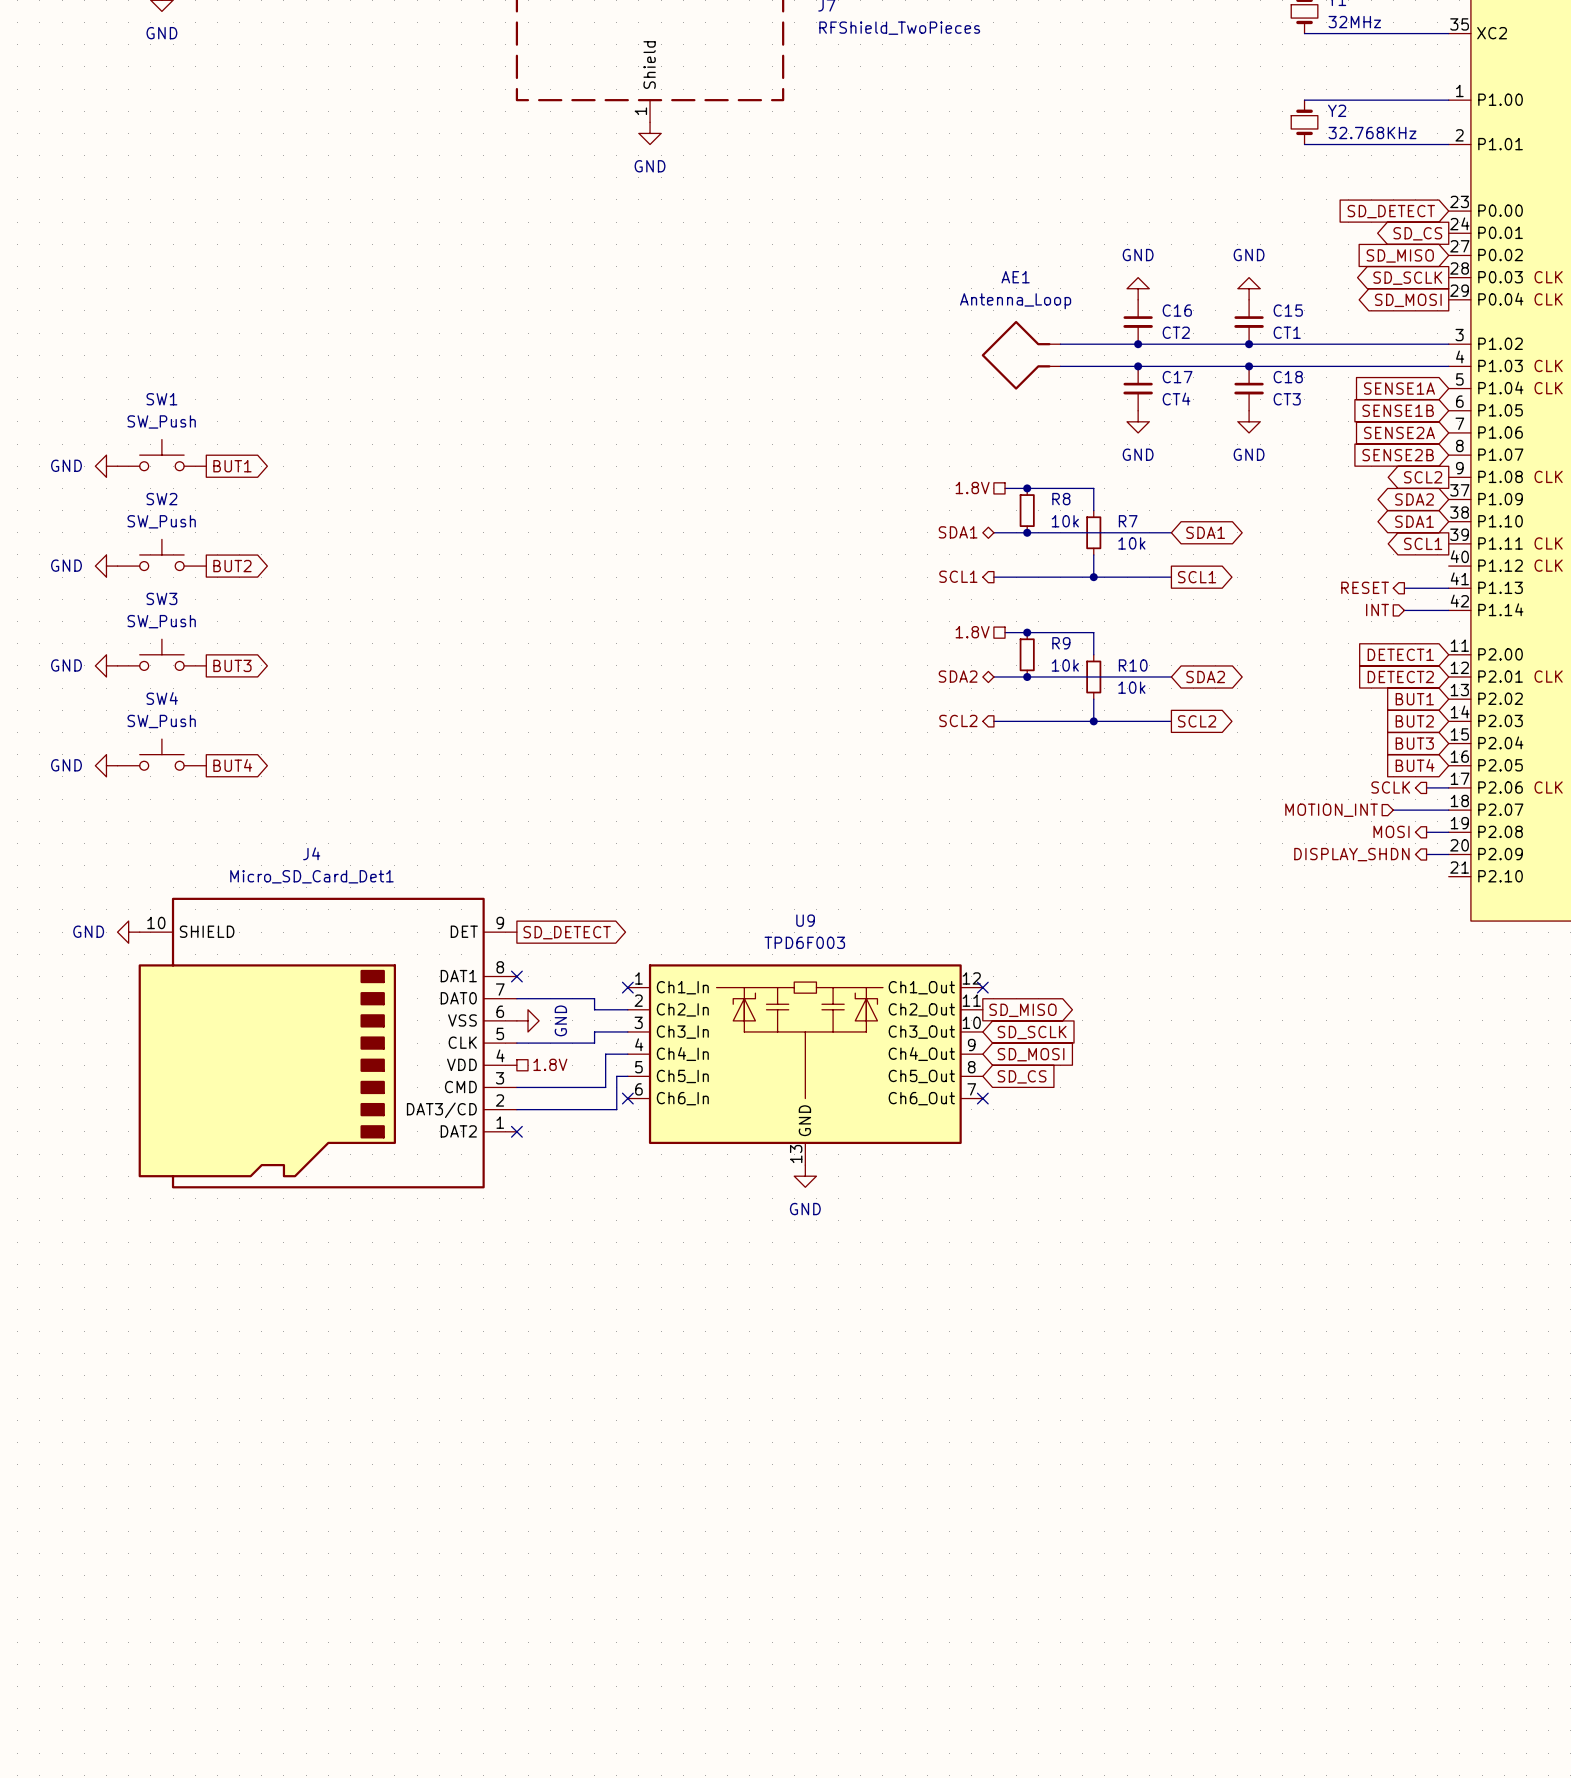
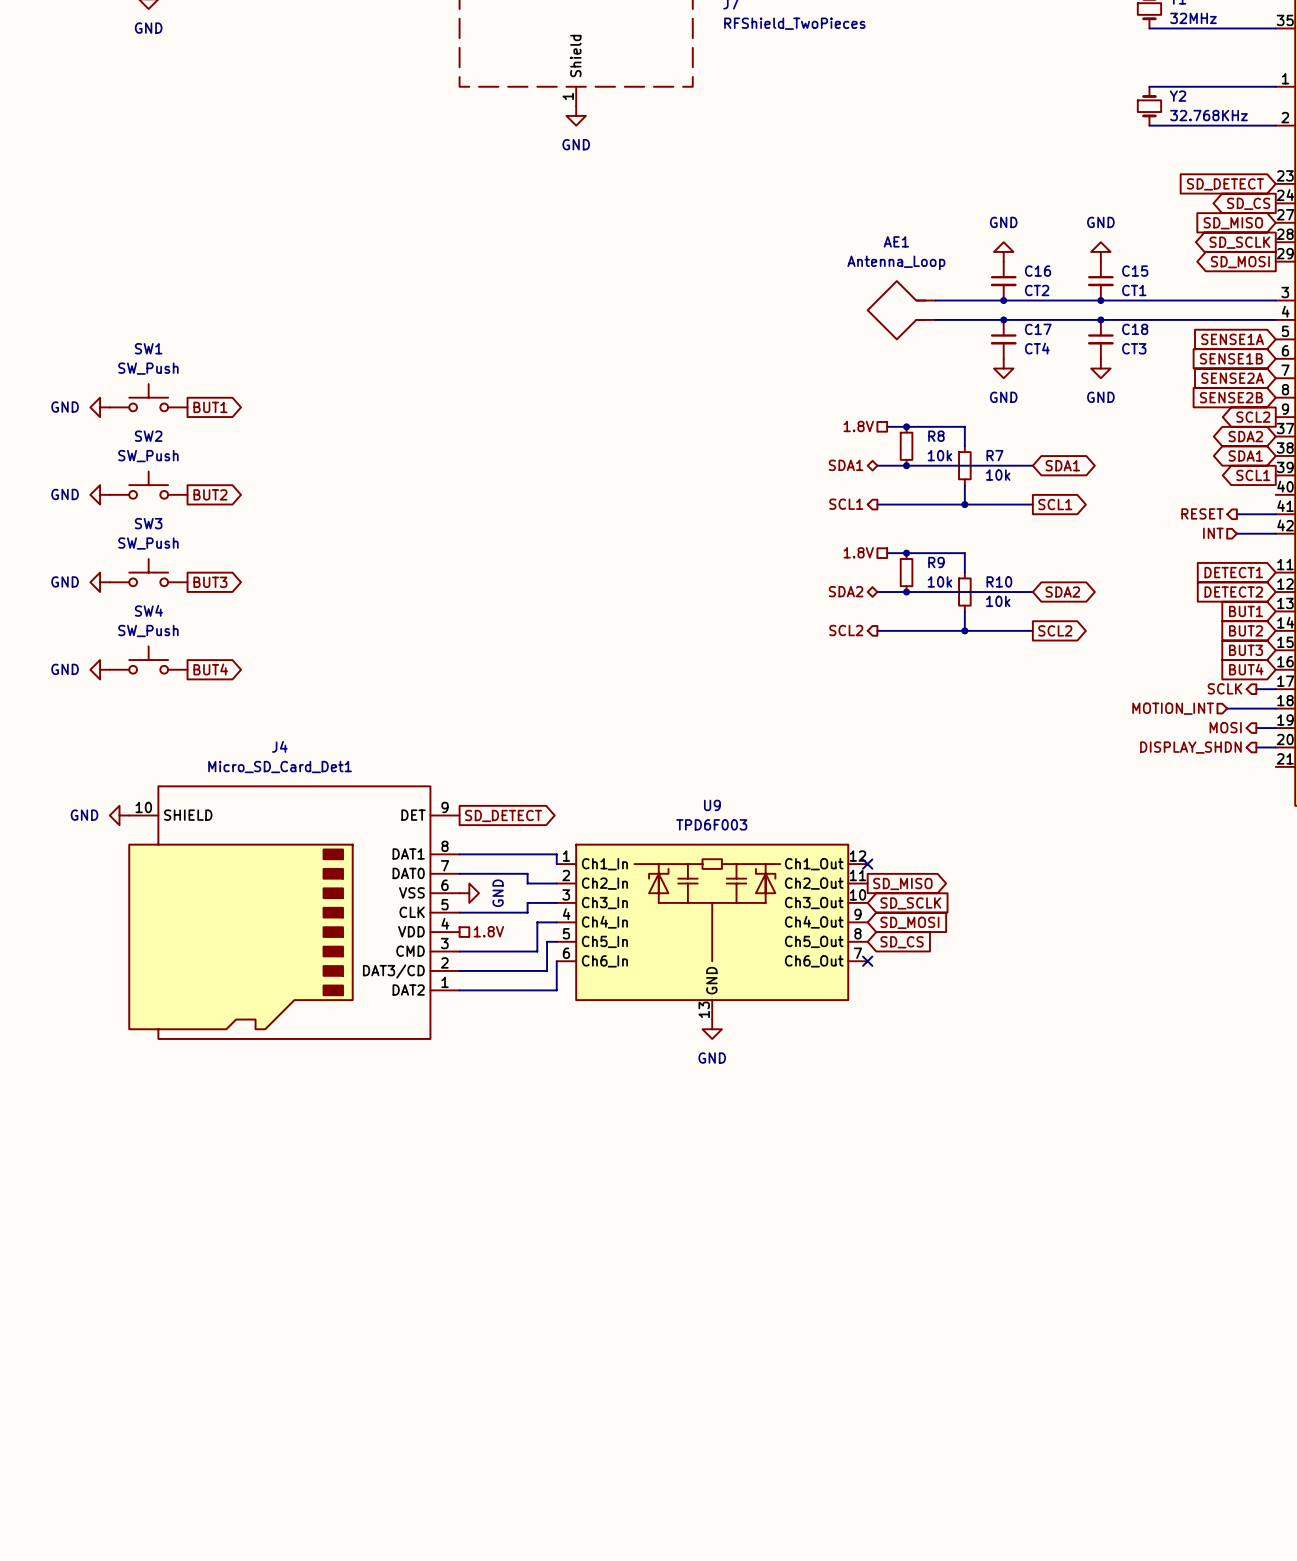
wire: none -> (459, 854) (556, 854) (556, 864)
no-connect mark: (516, 976) -> none
no-connect mark: (627, 987) -> none
wire: none -> (556, 961) (556, 990) (459, 990)
no-connect mark: (627, 1098) -> none
no-connect mark: (516, 1131) -> none

